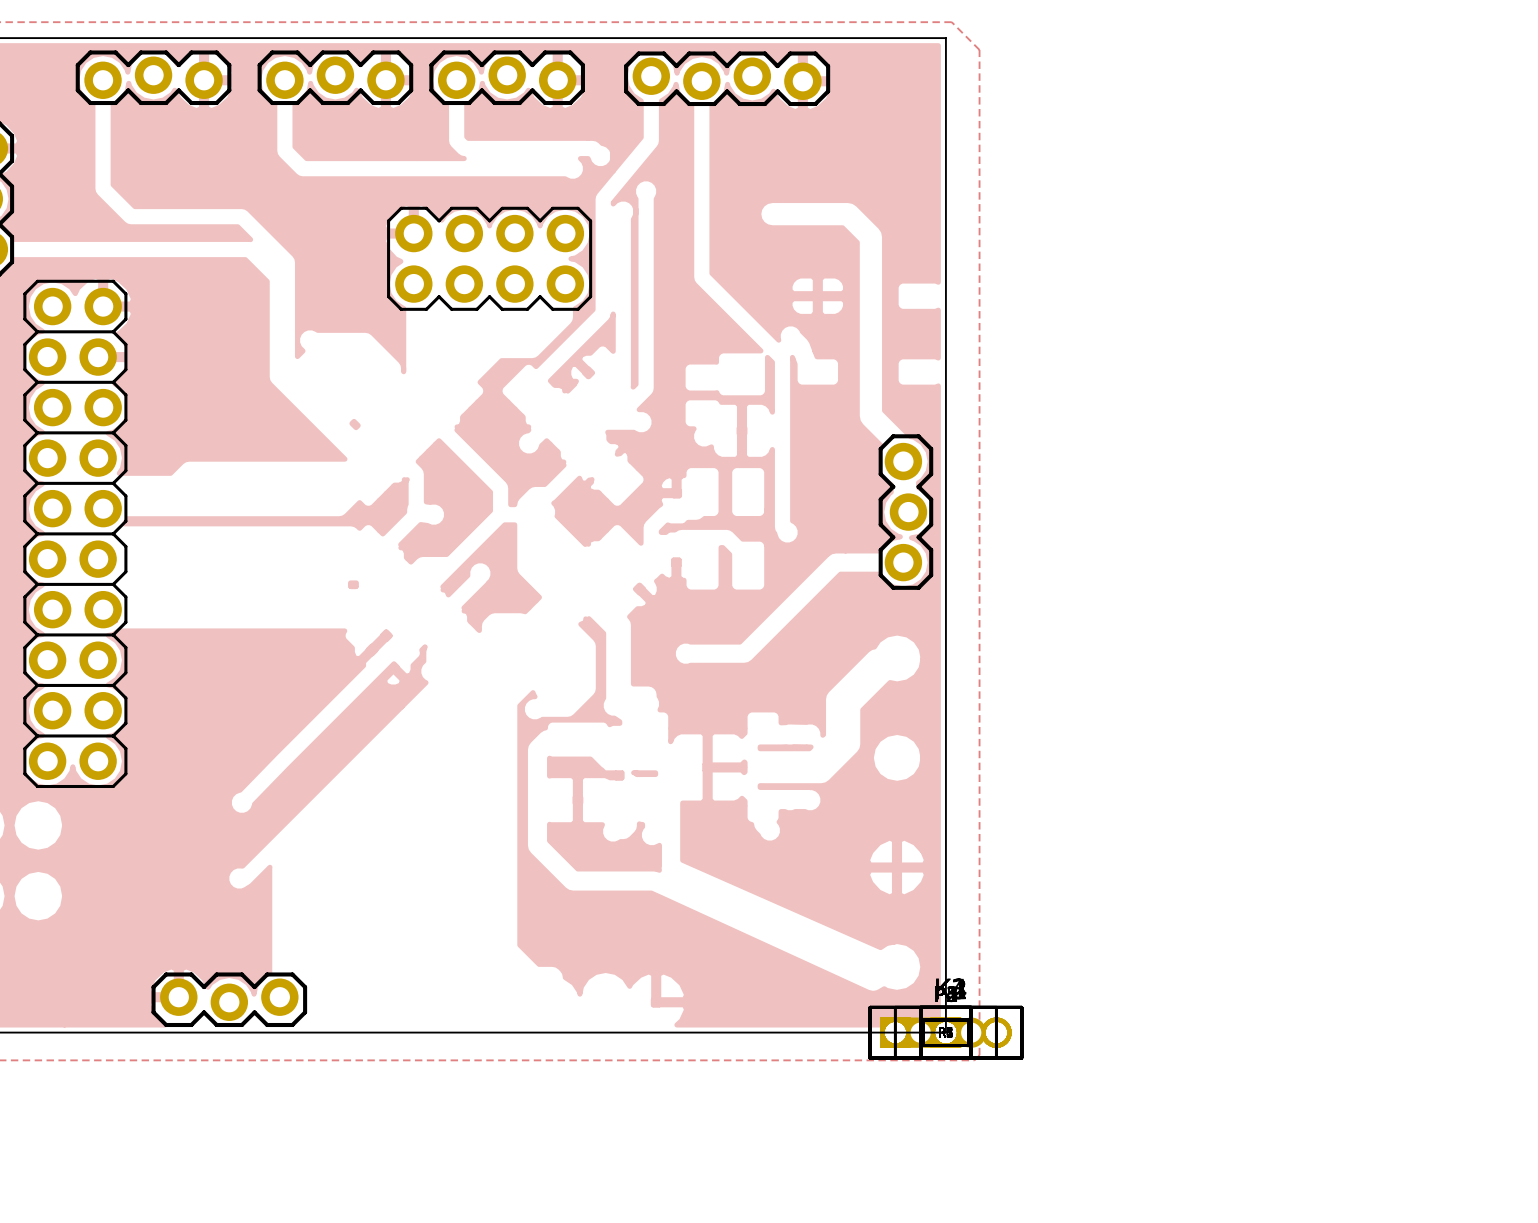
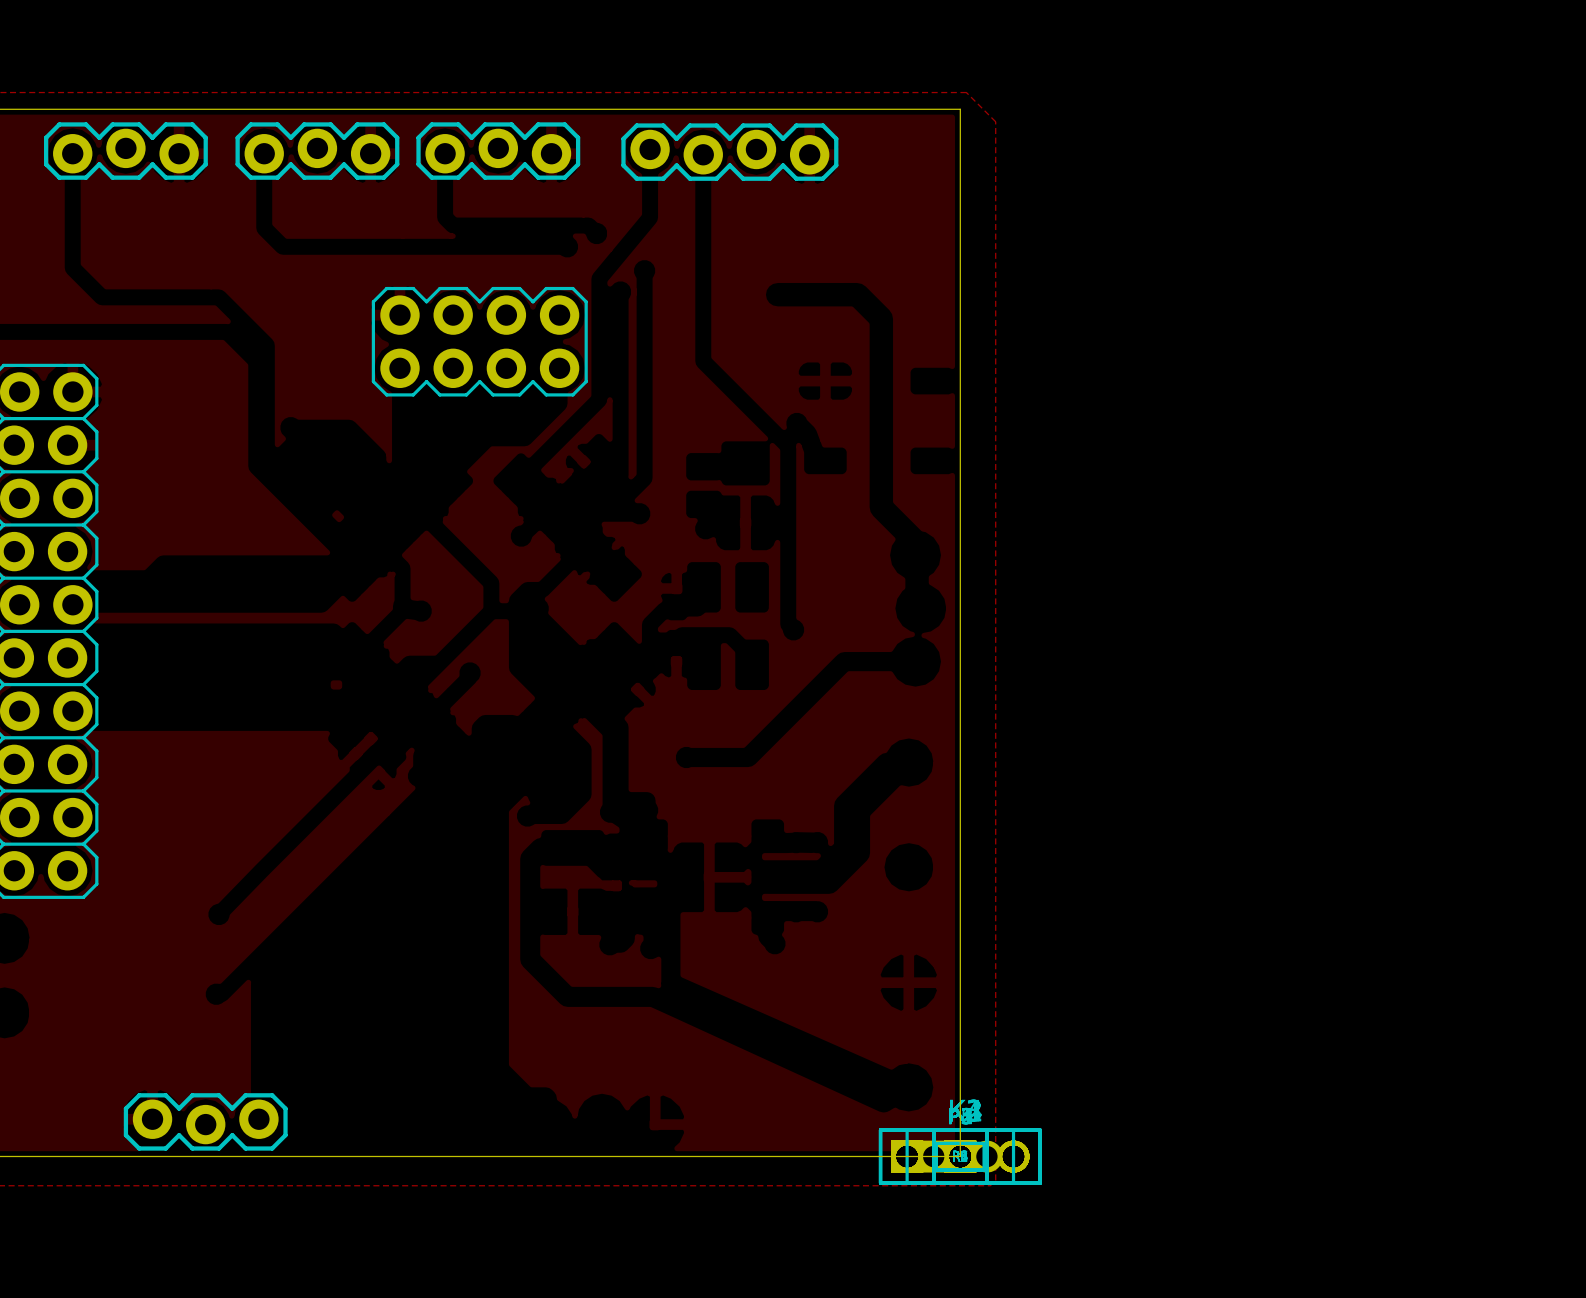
part: (905, 512) -> none

